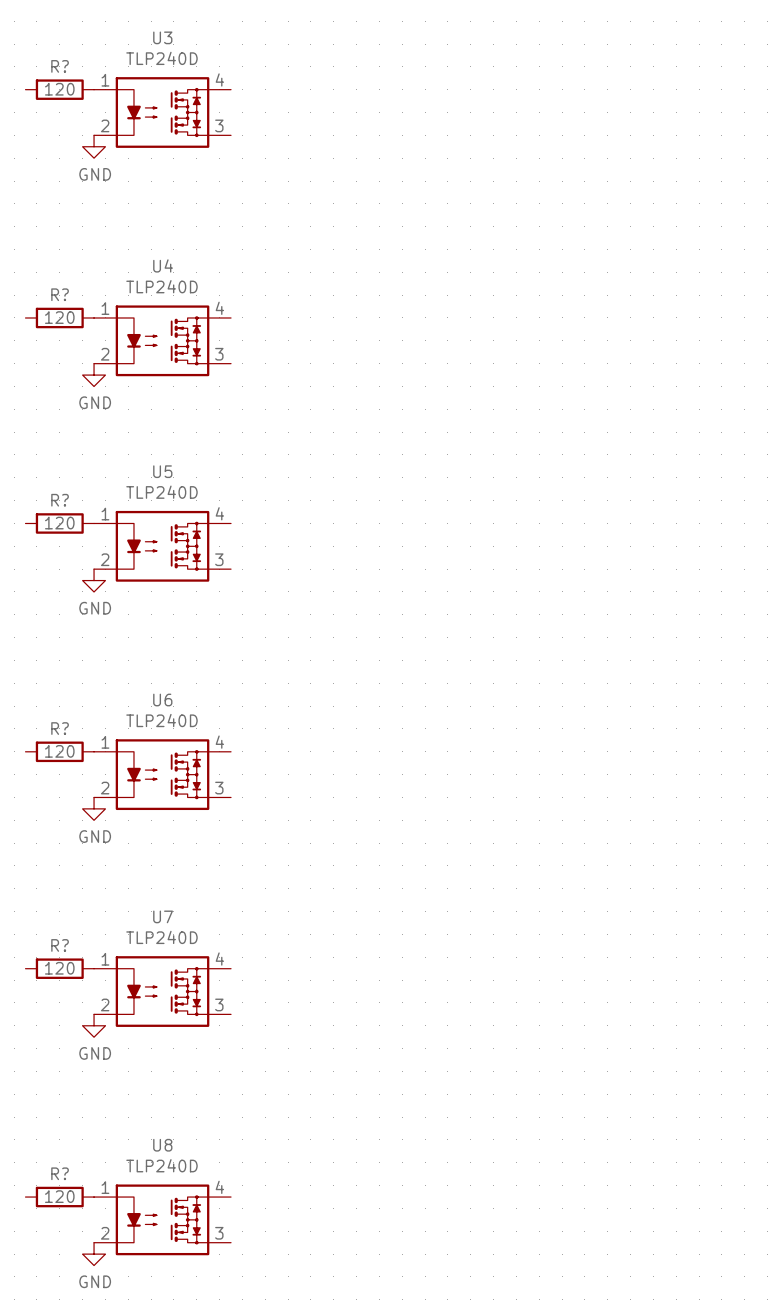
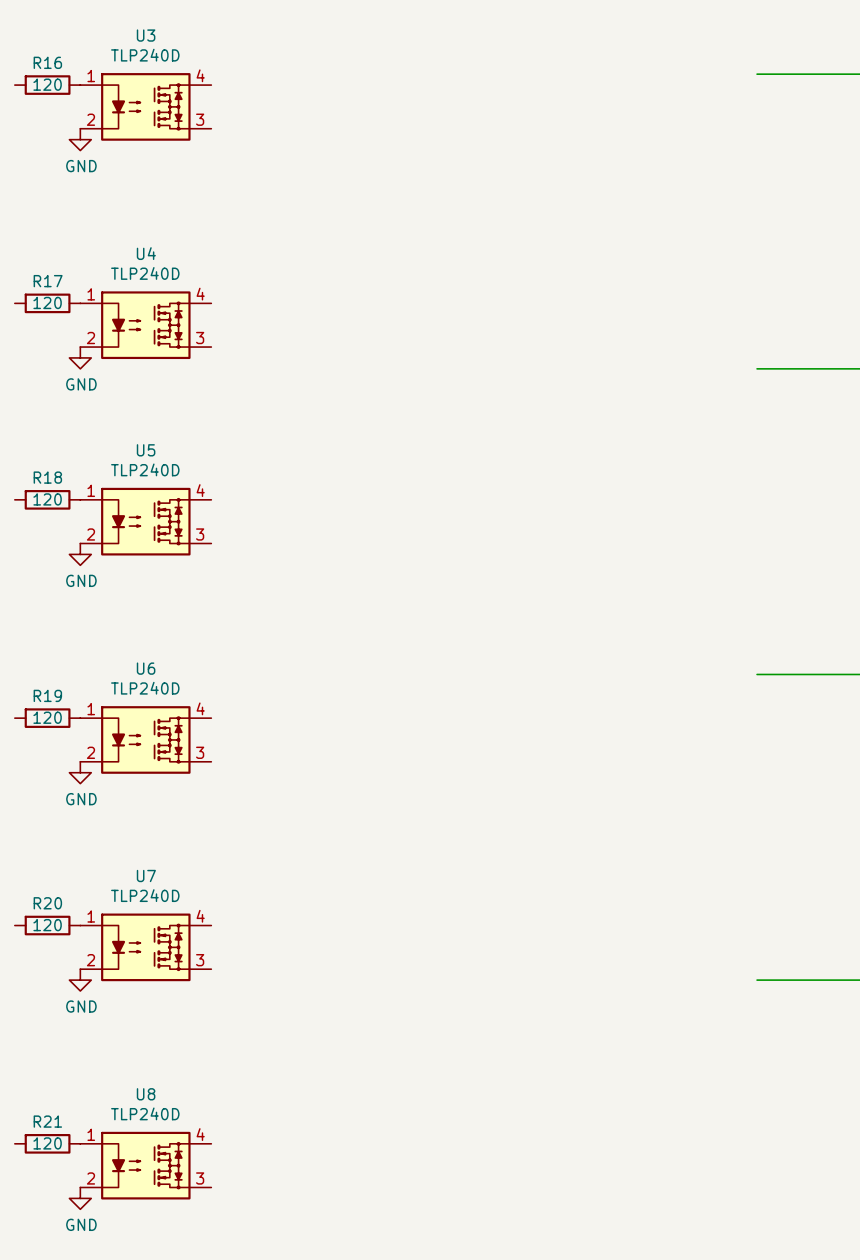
R? name: R? (60, 66) -> R16 (47, 62)
R? name: R? (60, 294) -> R17 (48, 281)
R? name: R? (60, 500) -> R18 (47, 477)
R? name: R? (60, 728) -> R19 (47, 695)
R? name: R? (60, 945) -> R20 (47, 903)
R? name: R? (60, 1173) -> R21 (47, 1121)

